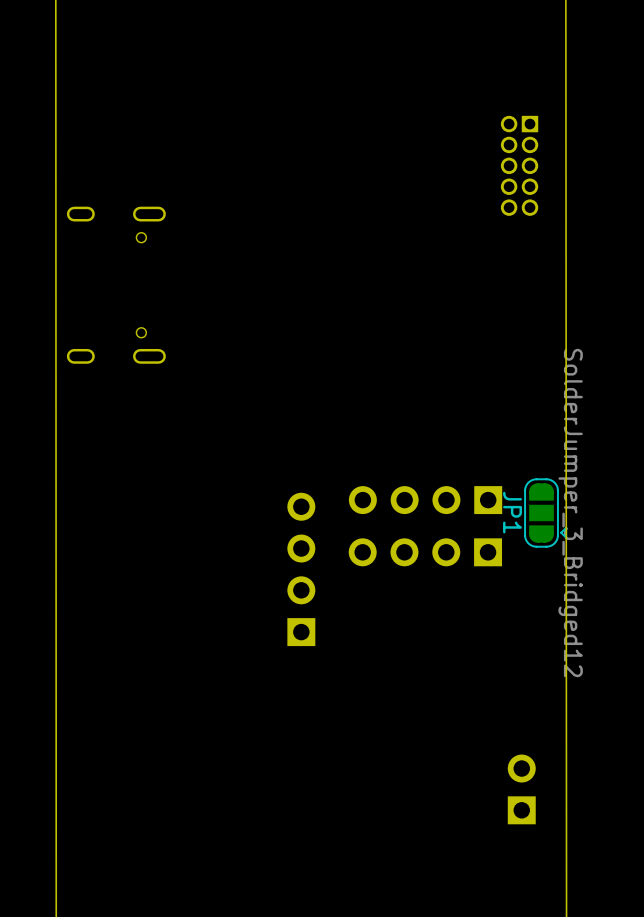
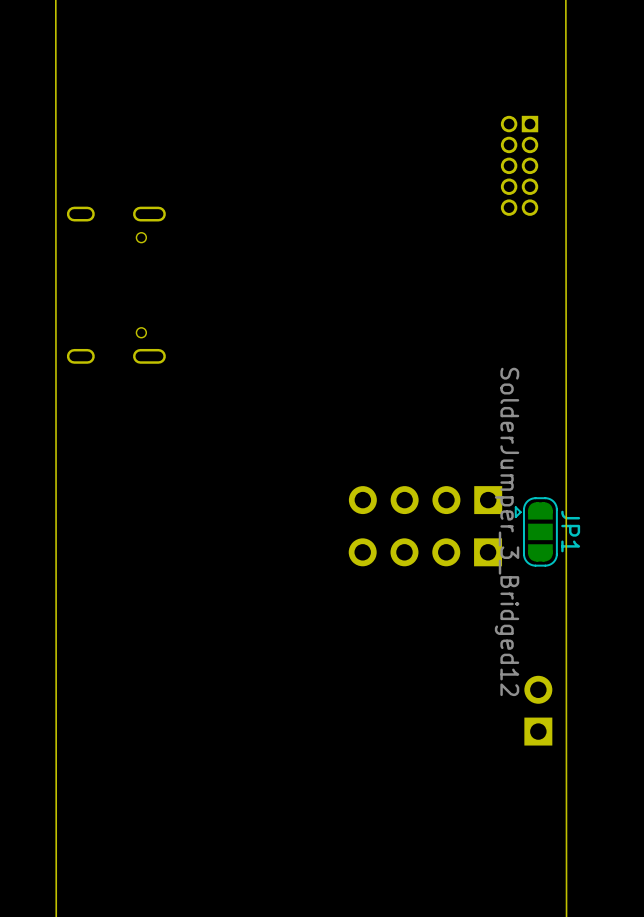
JP1 rotation: 0° (545, 513) -> 180° (536, 531)
part: (301, 569) -> none
part position: (521, 789) -> (538, 710)

